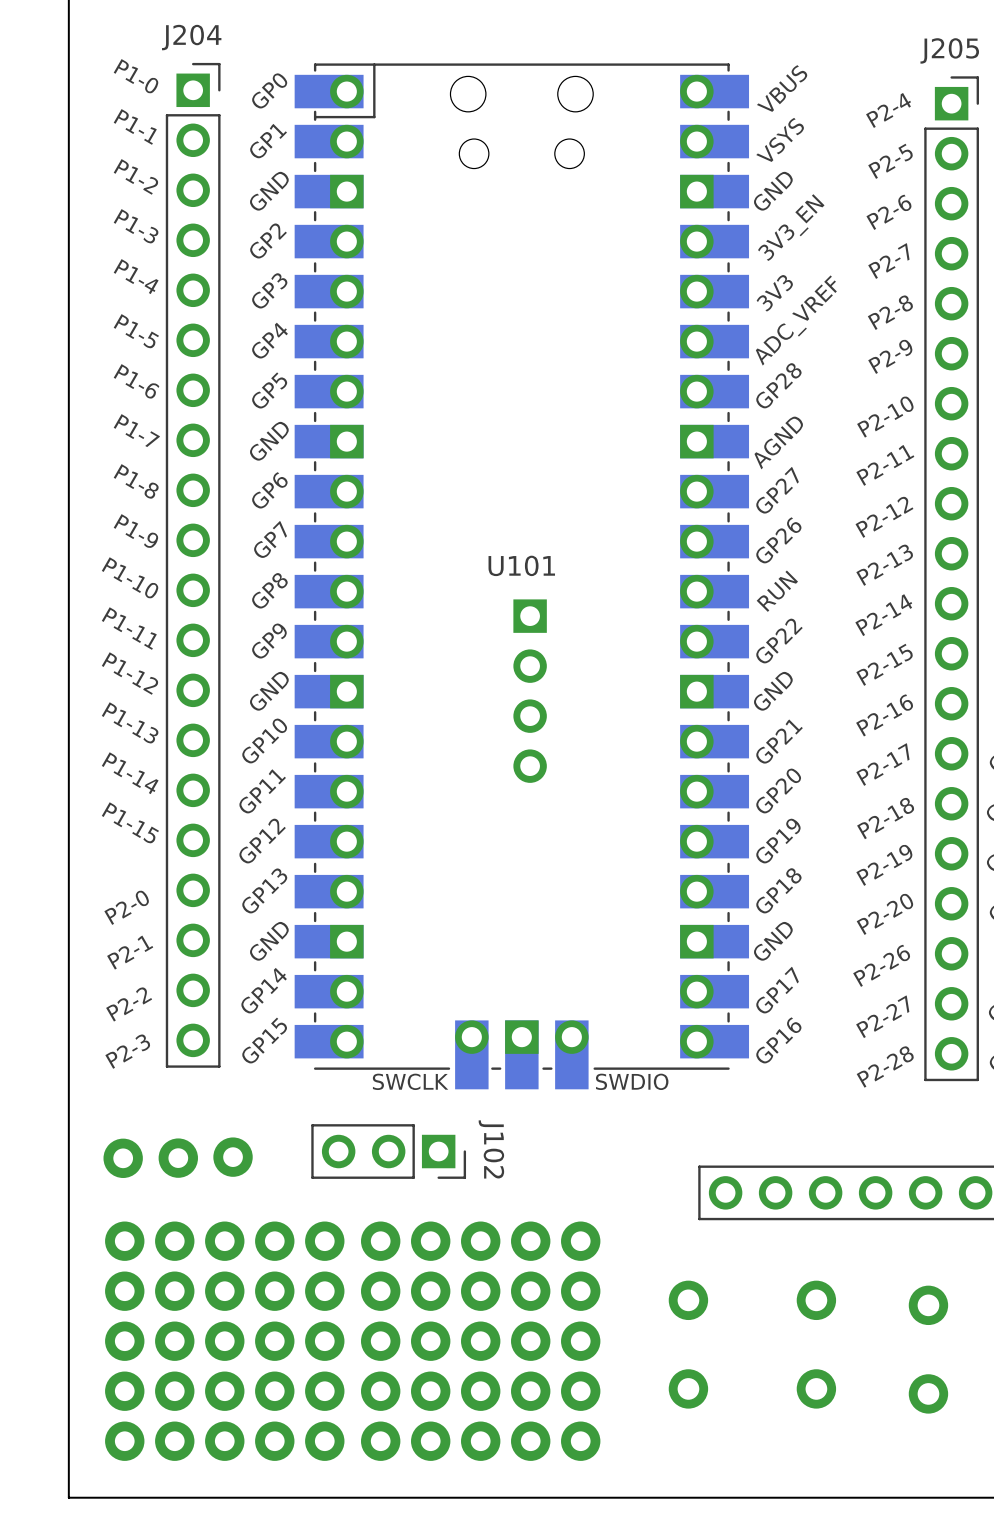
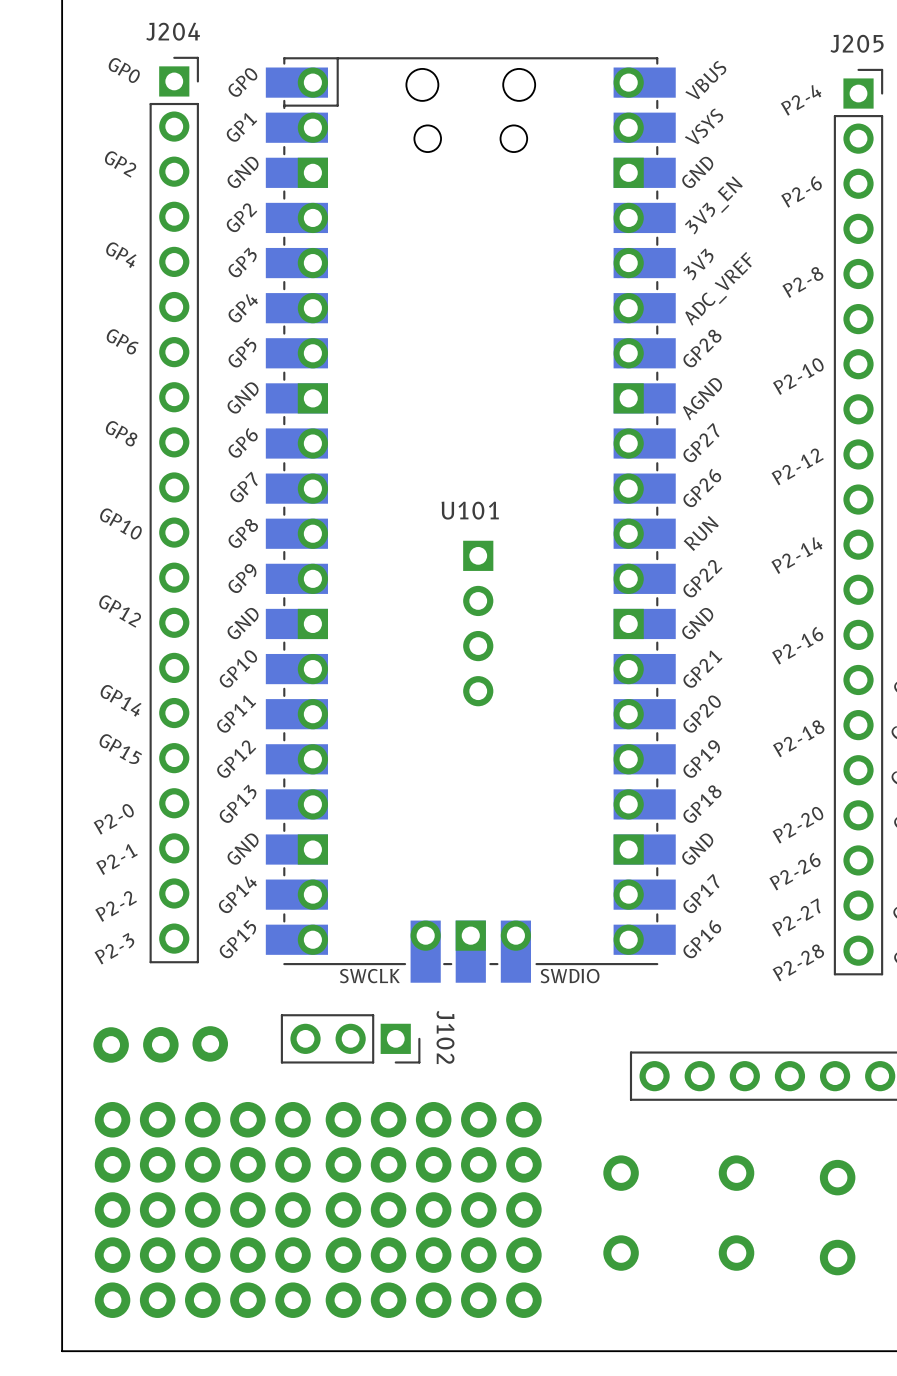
text: P1-0 (136, 76) -> GP0 (124, 70)
text: P1-1 (135, 126) -> none
text: P2-5 (890, 161) -> none
text: P1-2 (136, 176) -> GP2 (120, 164)
text: P1-3 (136, 226) -> none
text: P2-7 (888, 261) -> none
text: P1-4 (136, 276) -> GP4 (121, 255)
text: P1-5 (136, 331) -> none
text: P2-9 (890, 356) -> none
text: P1-6 (136, 381) -> GP6 (122, 341)
text: P1-7 (136, 430) -> none
text: P2-11 (885, 465) -> none
text: P1-8 (136, 481) -> GP8 (121, 433)
text: P1-9 (136, 531) -> none
text: P2-13 (884, 565) -> none
text: P1-10 (130, 578) -> GP10 (120, 523)
text: P1-11 (129, 628) -> none
text: P2-15 (884, 664) -> none
text: P1-12 (130, 673) -> GP12 (120, 611)
text: P1-13 (130, 722) -> none
text: P2-17 (882, 764) -> none
text: P1-14 (130, 773) -> GP14 (121, 700)
text: P1-15 (130, 822) -> GP15 (120, 749)
text: P2-19 (884, 865) -> none

